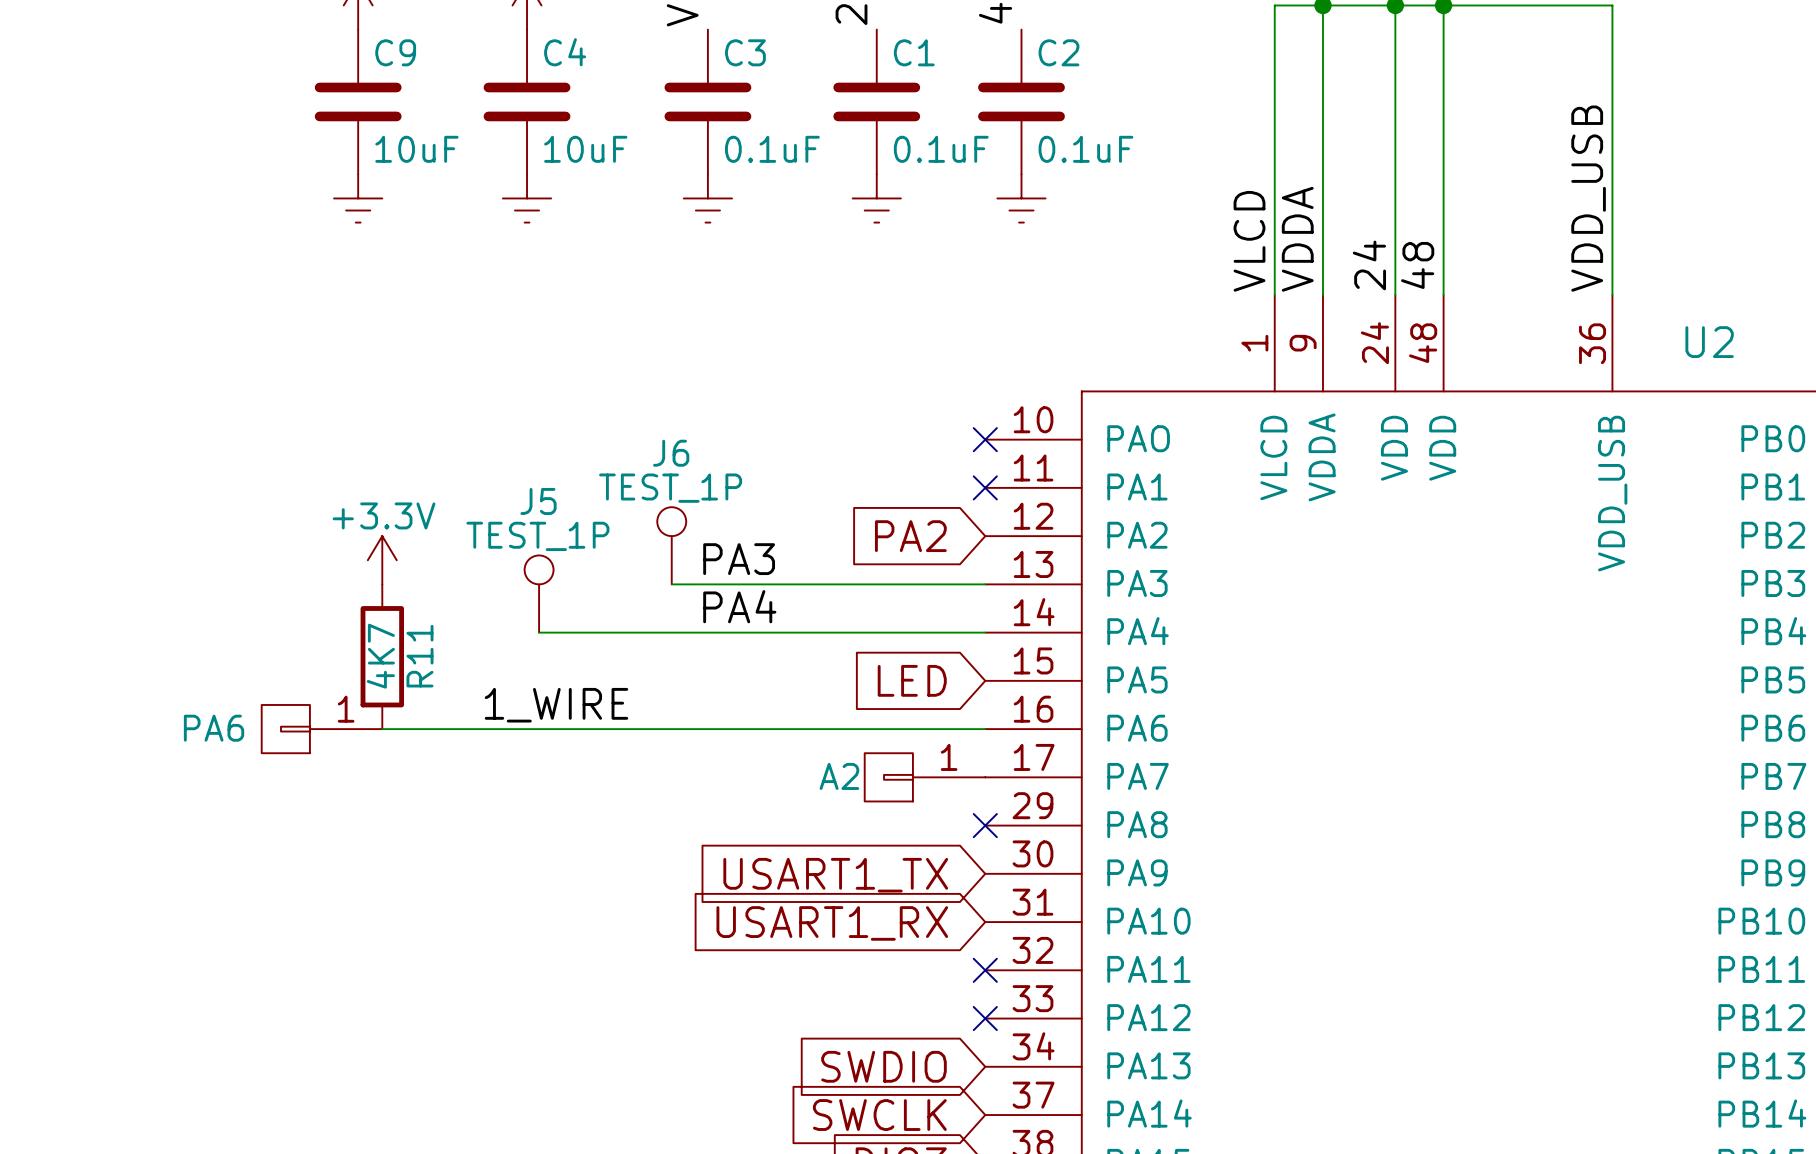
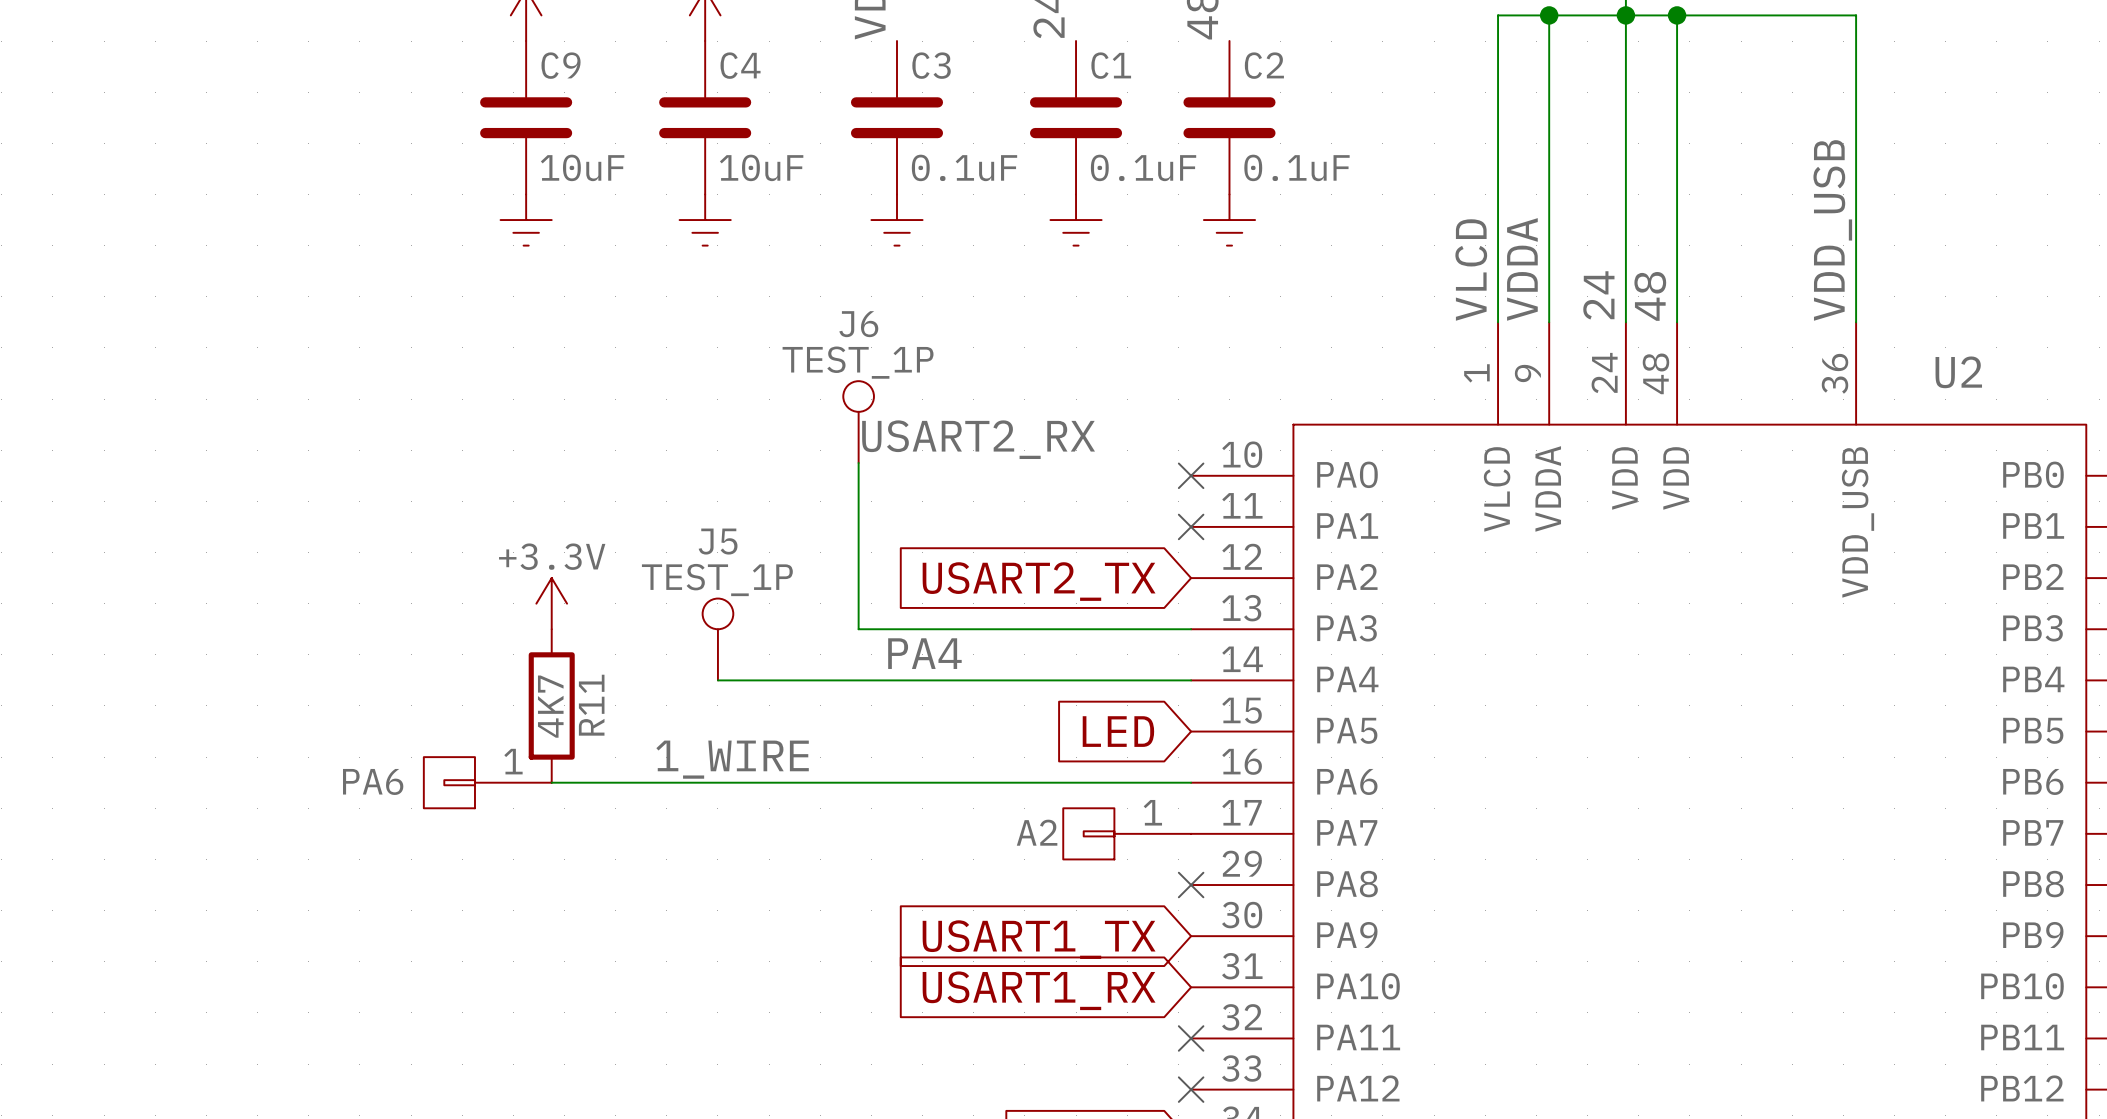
label: none -> USART2_RX (978, 439)
wire: none -> (858, 463) (858, 629)
global label: PA2 (910, 536) -> USART2_TX (1039, 581)
J6 position: (671, 545) -> (858, 422)
label: PA3 (739, 559) -> none

